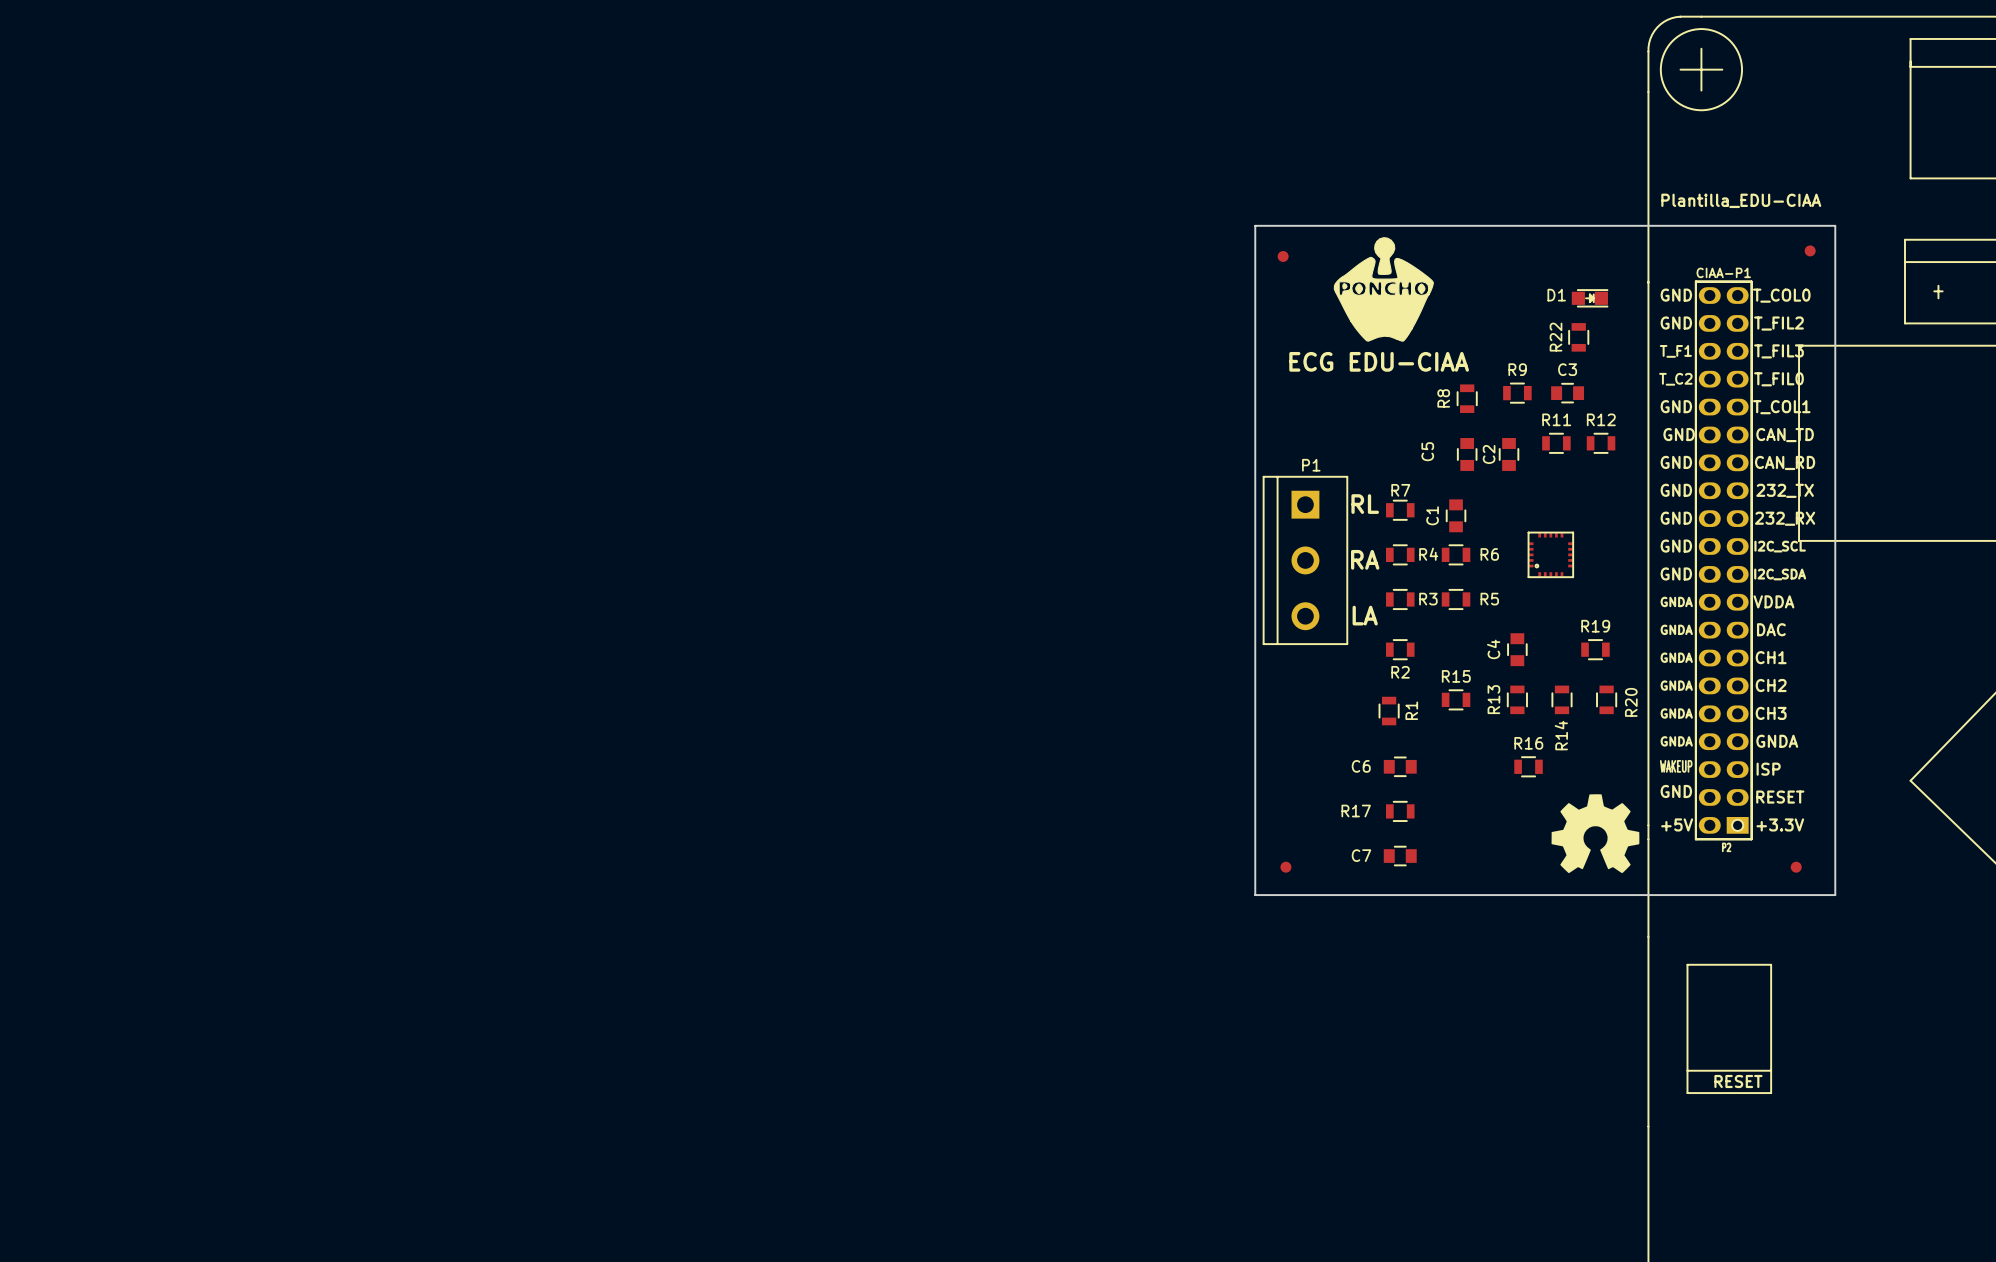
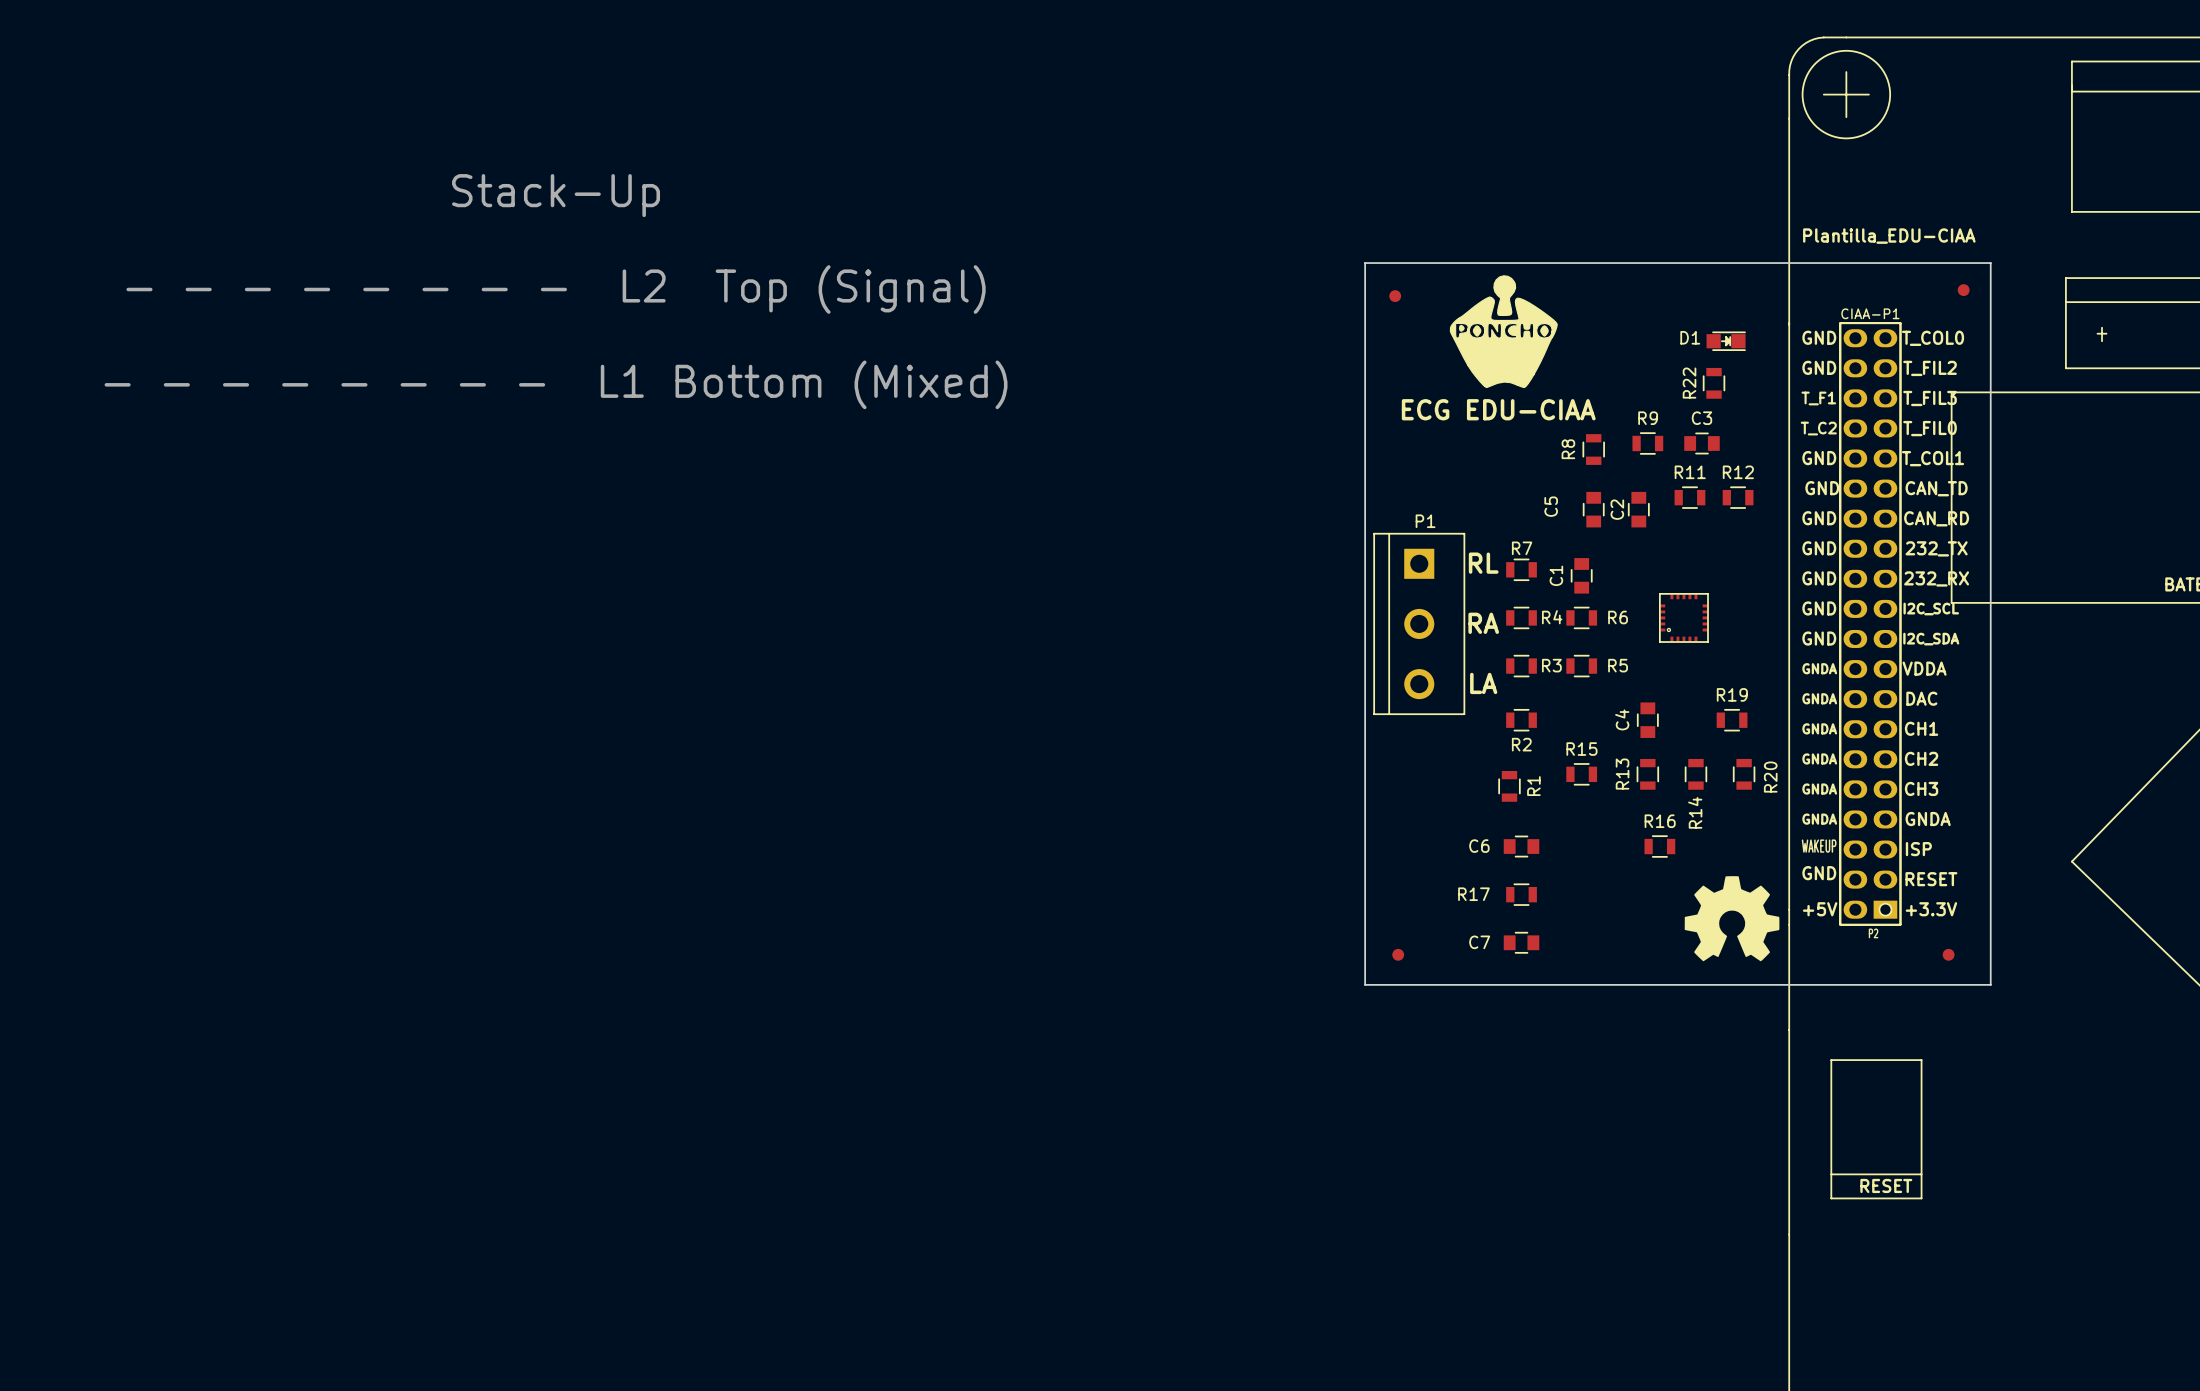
text: none -> Stack-Up (556, 195)
text: none -> - - - - - - - - L2 Top (Signal) (556, 289)
text: none -> - - - - - - - - L1 Bottom (Mixed) (556, 384)

